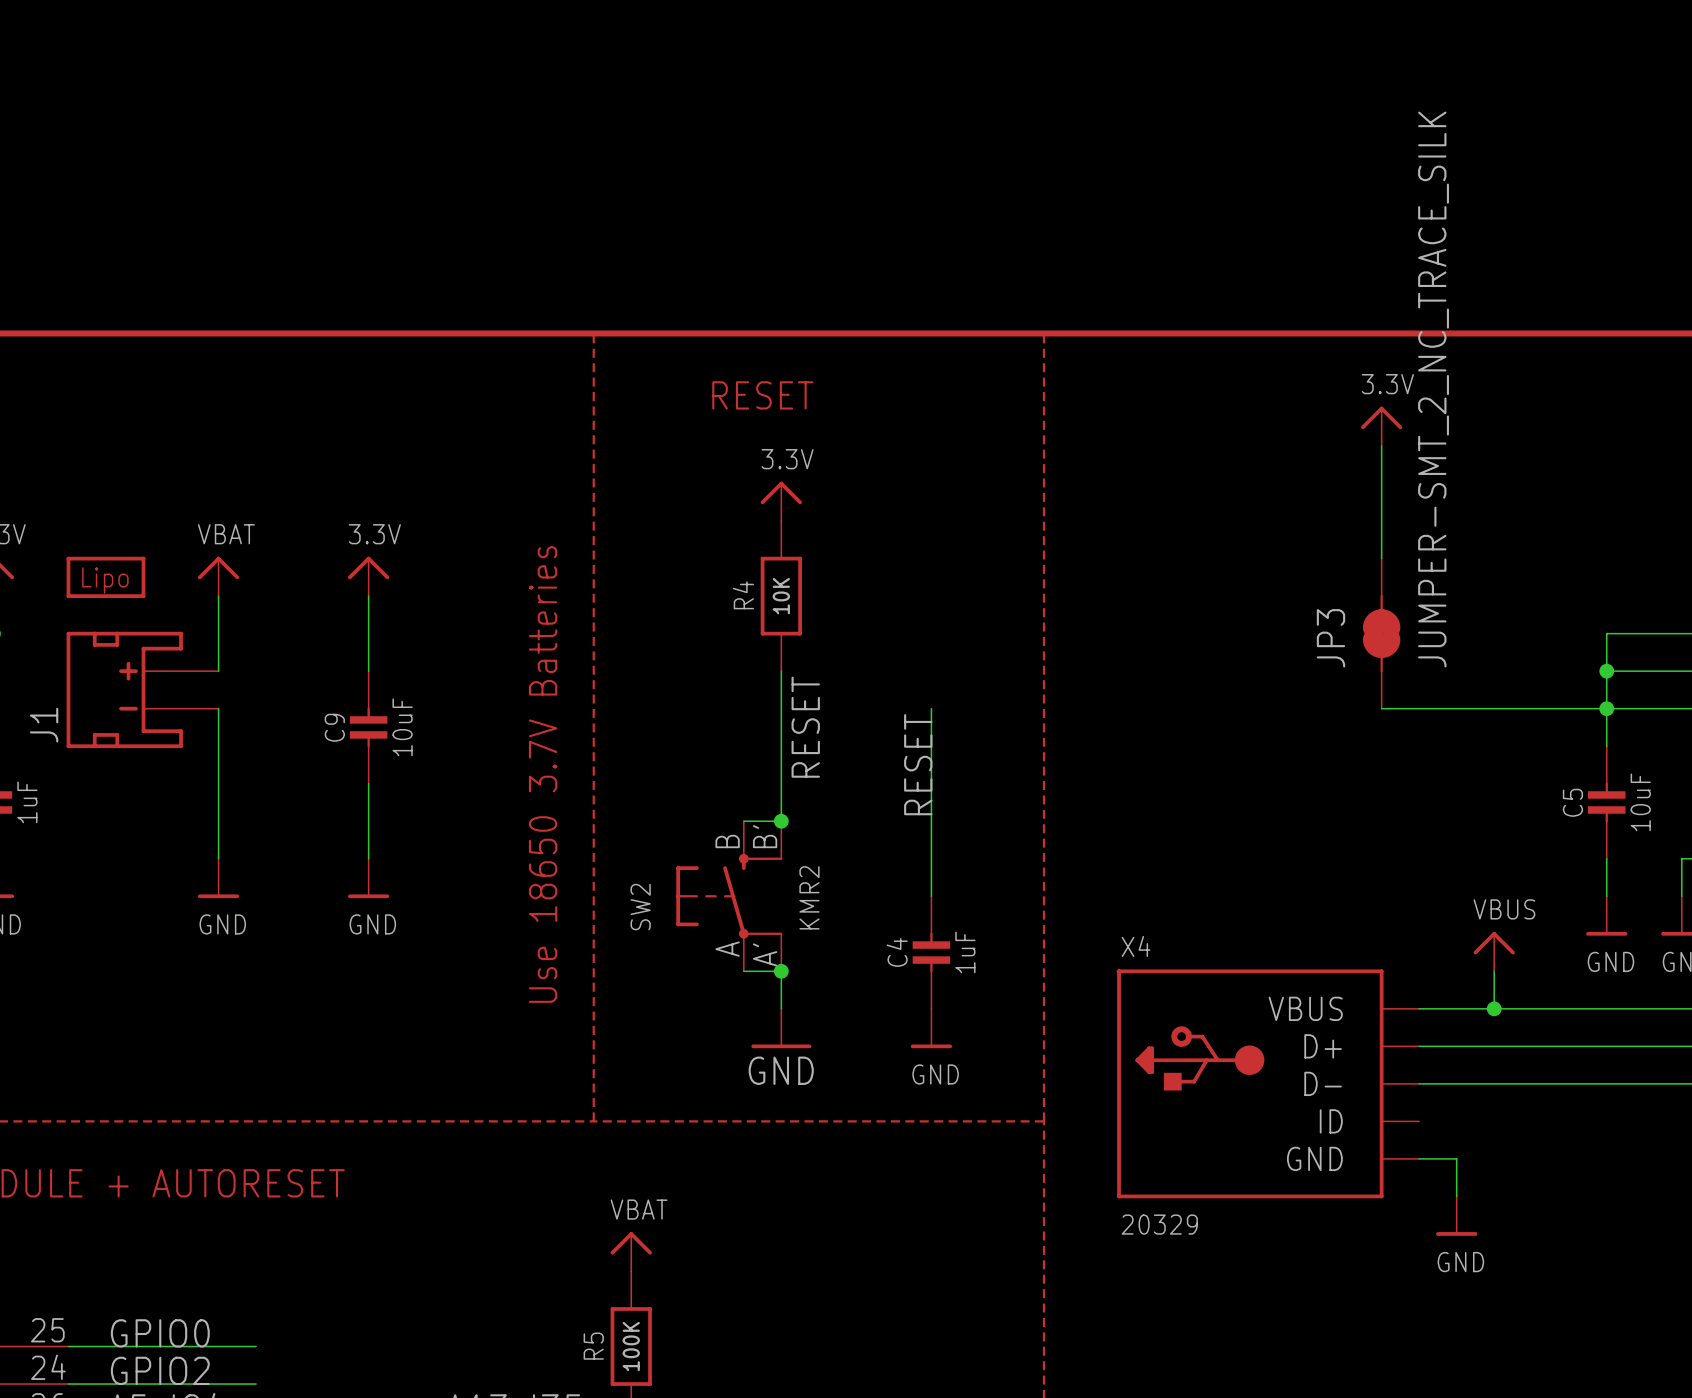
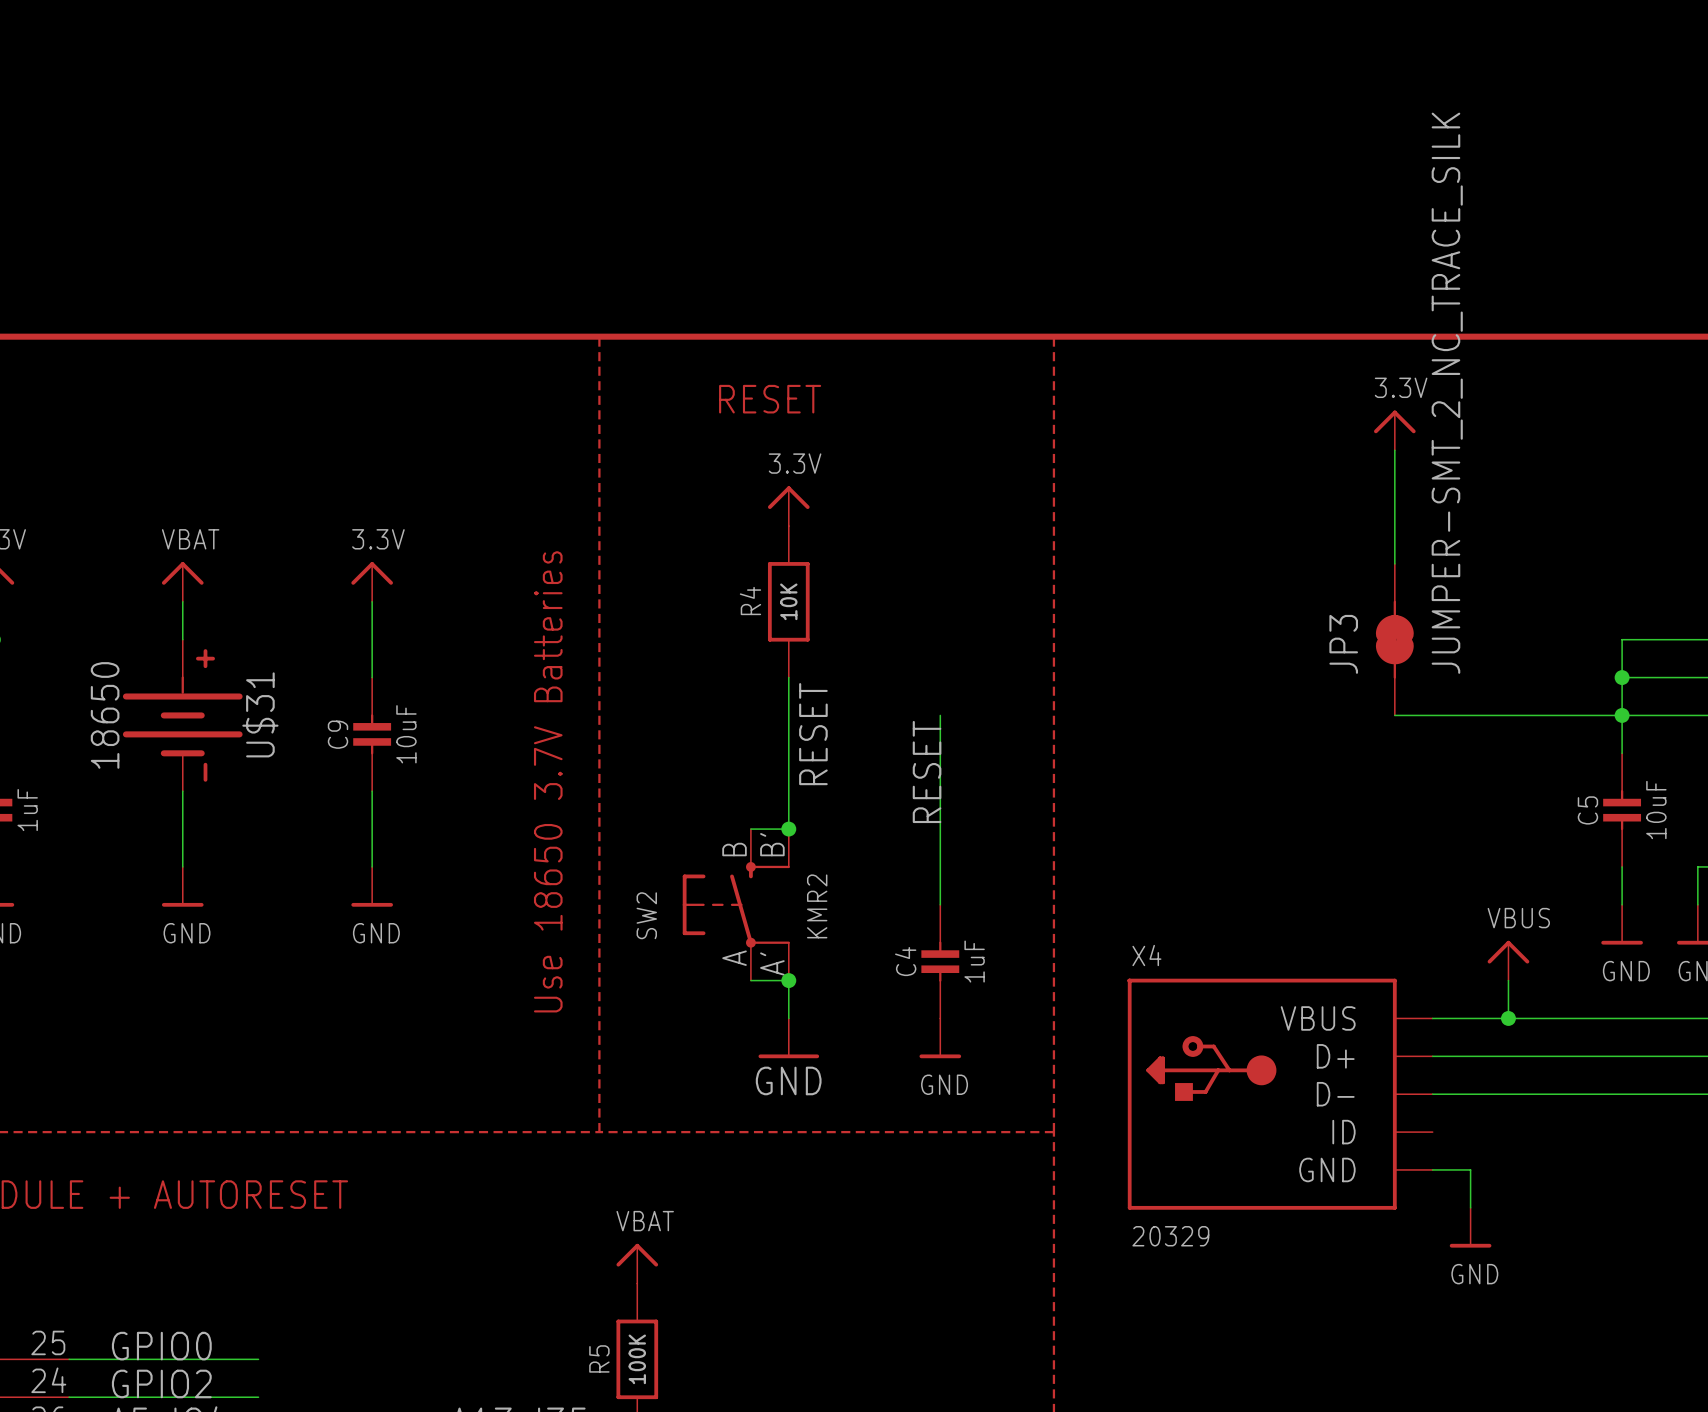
power symbol position: VBAT (218, 576) -> VBAT (182, 581)
part: (106, 577) -> none
wire: none -> (182, 601) (182, 639)
wire: (218, 596) (218, 671) -> (182, 791) (182, 866)
J1: (142, 689) -> none
U$31: none -> 18650 (182, 715)
wire: (218, 708) (218, 858) -> none
power symbol position: GND (218, 878) -> GND (182, 886)

